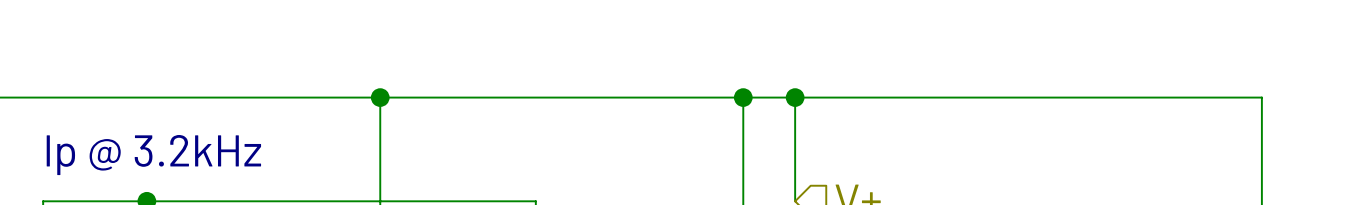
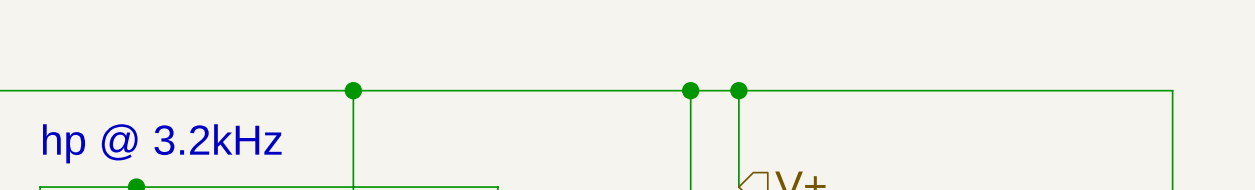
text: lp @ 3.2kHz (153, 155) -> hp @ 3.2kHz (162, 143)

